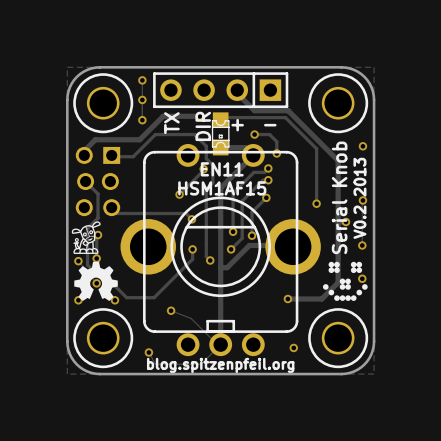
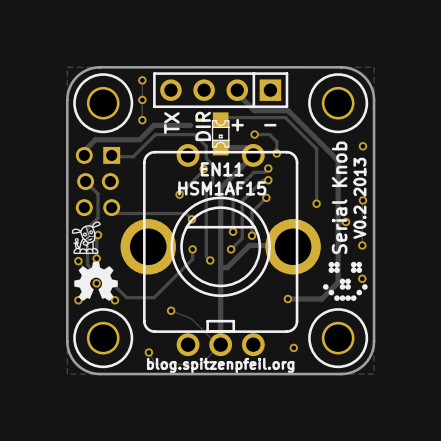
track: (199, 116) (163, 116) (154, 125) -> (190, 125) (154, 125)

